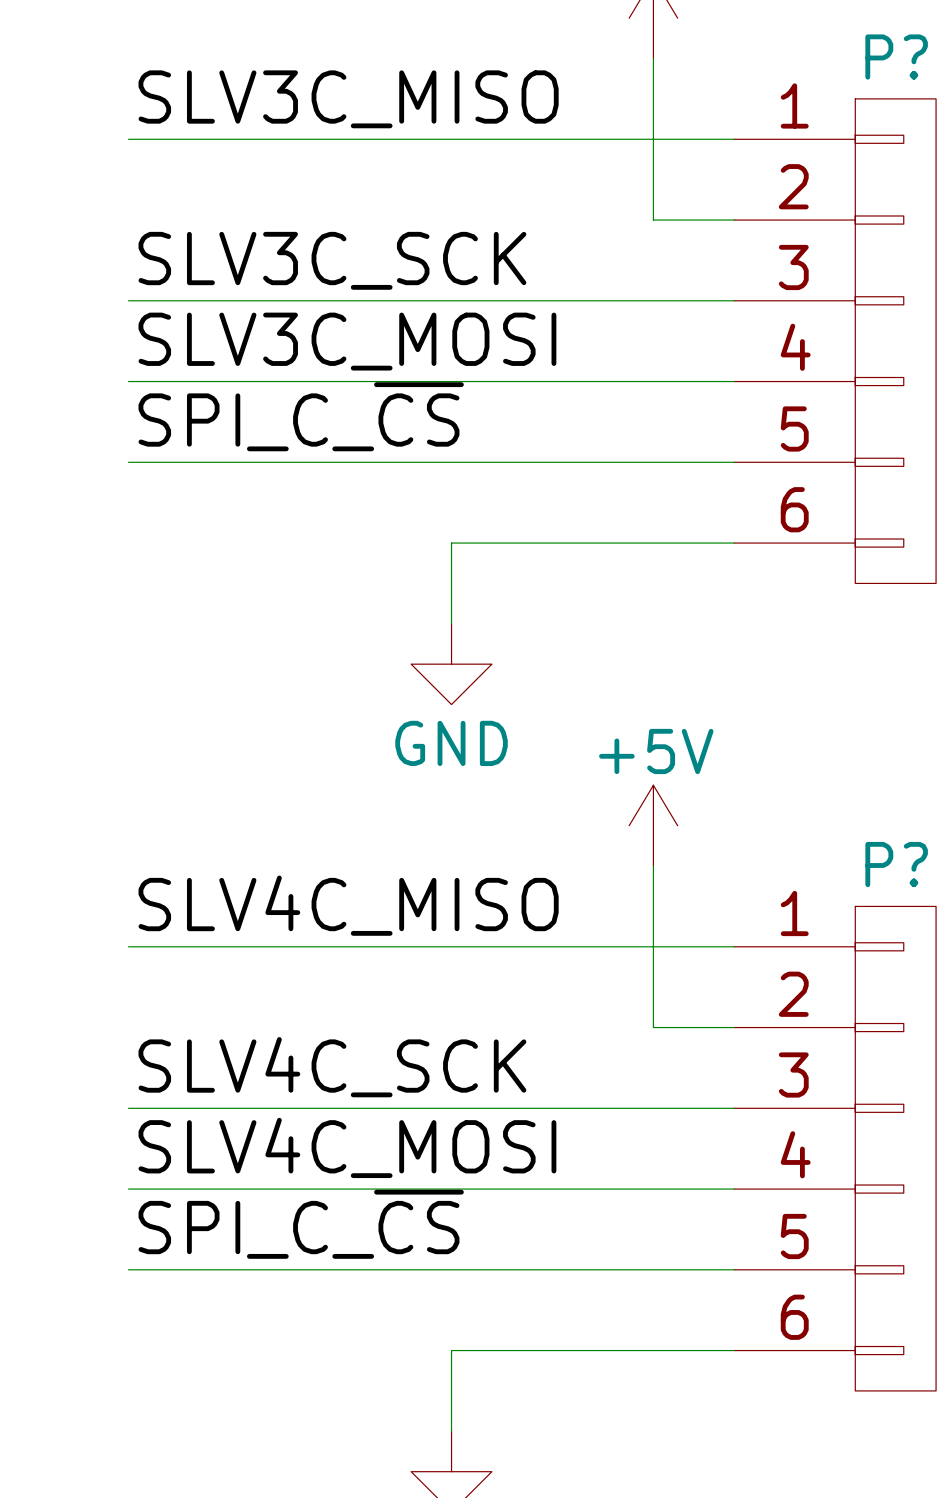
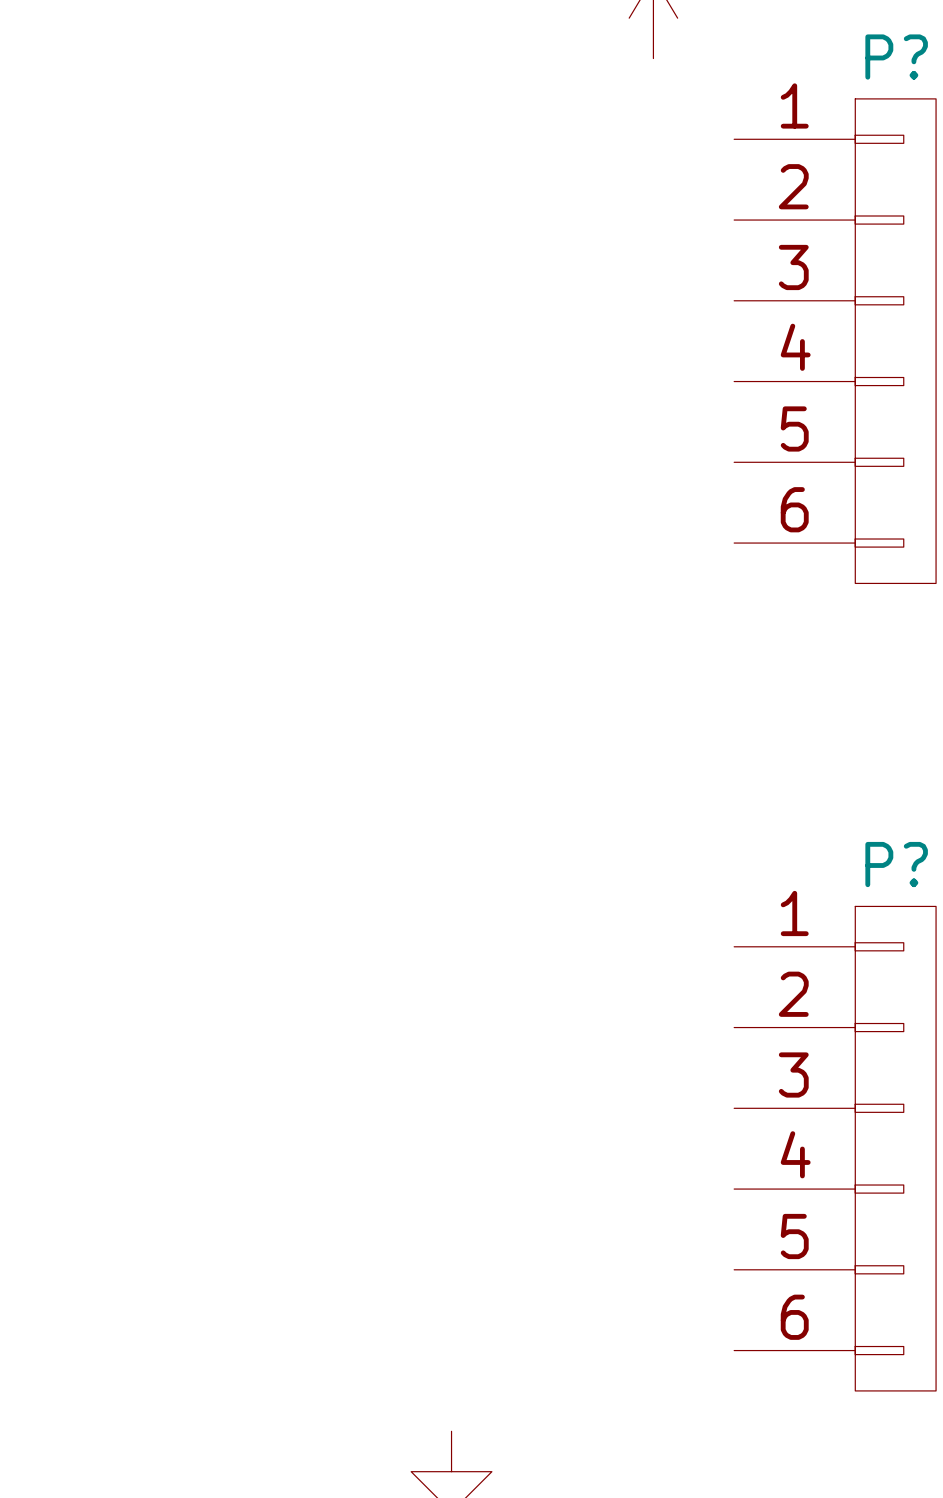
wire: (653, 58) (653, 220) (734, 220) -> none
label: SLV3C_MISO (348, 99) -> none
wire: (128, 139) (734, 139) -> none
label: SLV3C_SCK (332, 260) -> none
wire: (128, 300) (734, 300) -> none
label: SLV3C_MOSI (347, 341) -> none
wire: (128, 381) (734, 381) -> none
label: SPI_C_~{CS} (301, 416) -> none
wire: (128, 462) (734, 462) -> none
wire: (734, 543) (451, 543) (451, 623) -> none
power symbol: GND (451, 664) -> none
power symbol: +5V (653, 825) -> none
wire: (653, 866) (653, 1027) (734, 1027) -> none
label: SLV4C_MISO (348, 905) -> none
wire: (128, 946) (734, 946) -> none
label: SLV4C_SCK (332, 1067) -> none
wire: (128, 1108) (734, 1108) -> none
label: SLV4C_MOSI (347, 1147) -> none
wire: (128, 1189) (734, 1189) -> none
label: SPI_C_~{CS} (301, 1224) -> none
wire: (128, 1269) (734, 1269) -> none
wire: (734, 1350) (451, 1350) (451, 1431) -> none

